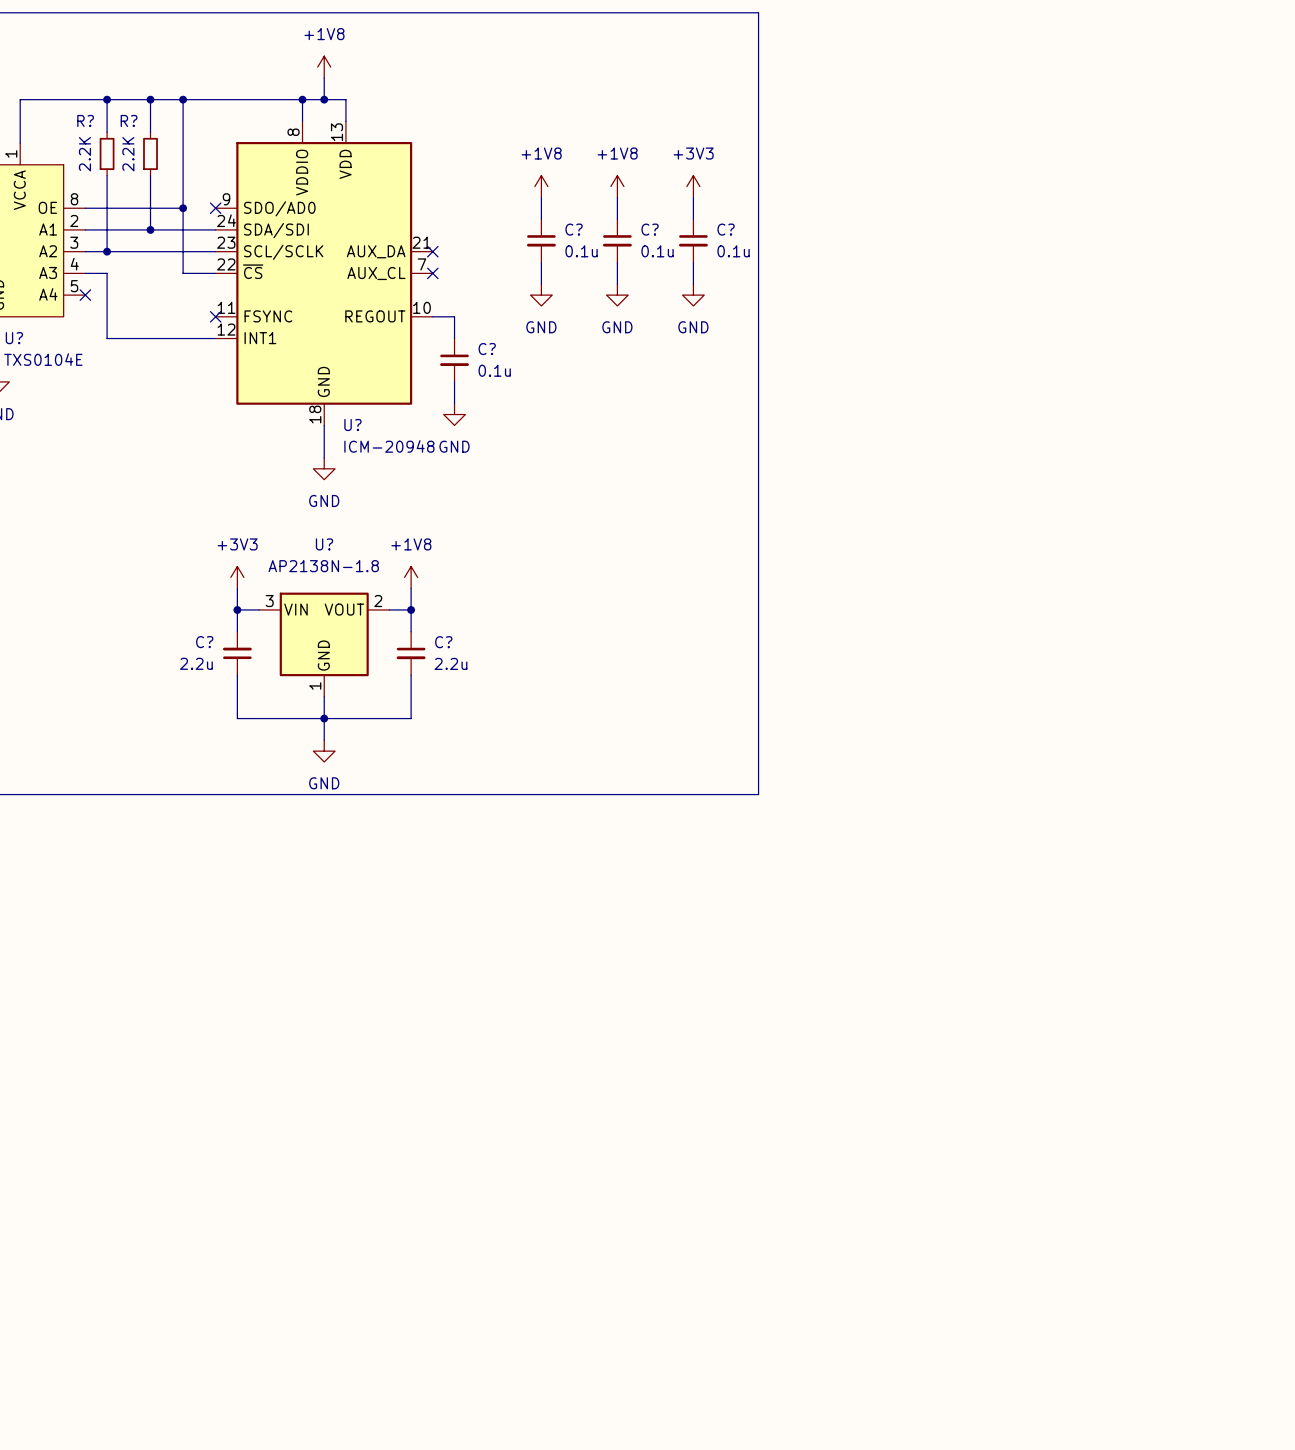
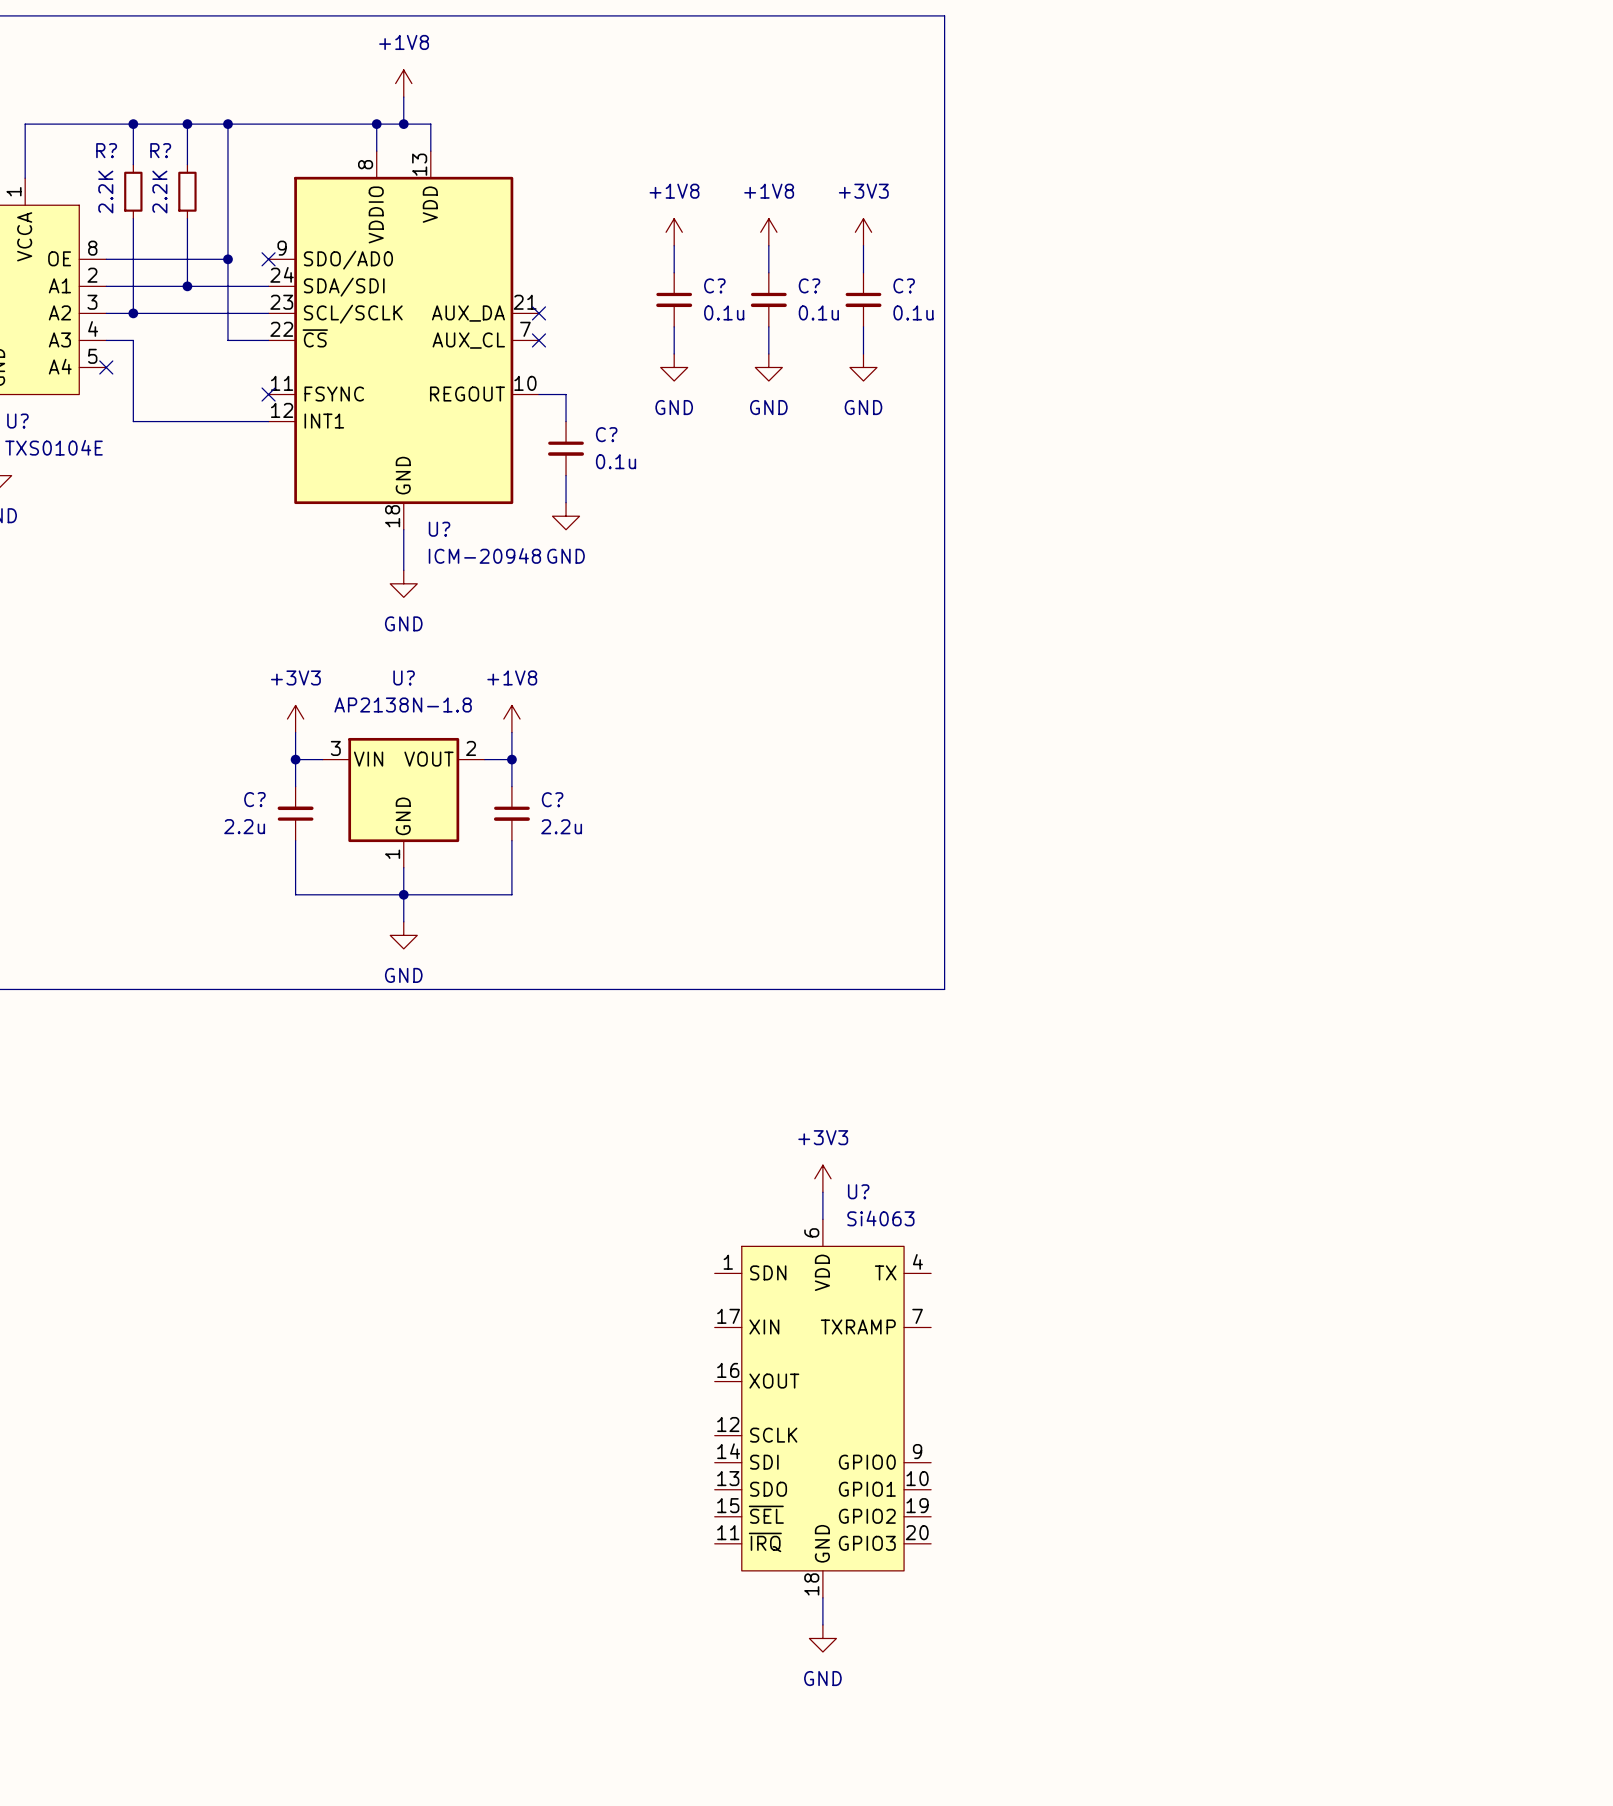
power symbol: none -> +3V3 (822, 1178)
wire: none -> (822, 1192) (822, 1219)
U?: none -> Si4063 (822, 1408)
wire: none -> (822, 1597) (822, 1624)
power symbol: none -> GND (822, 1638)

